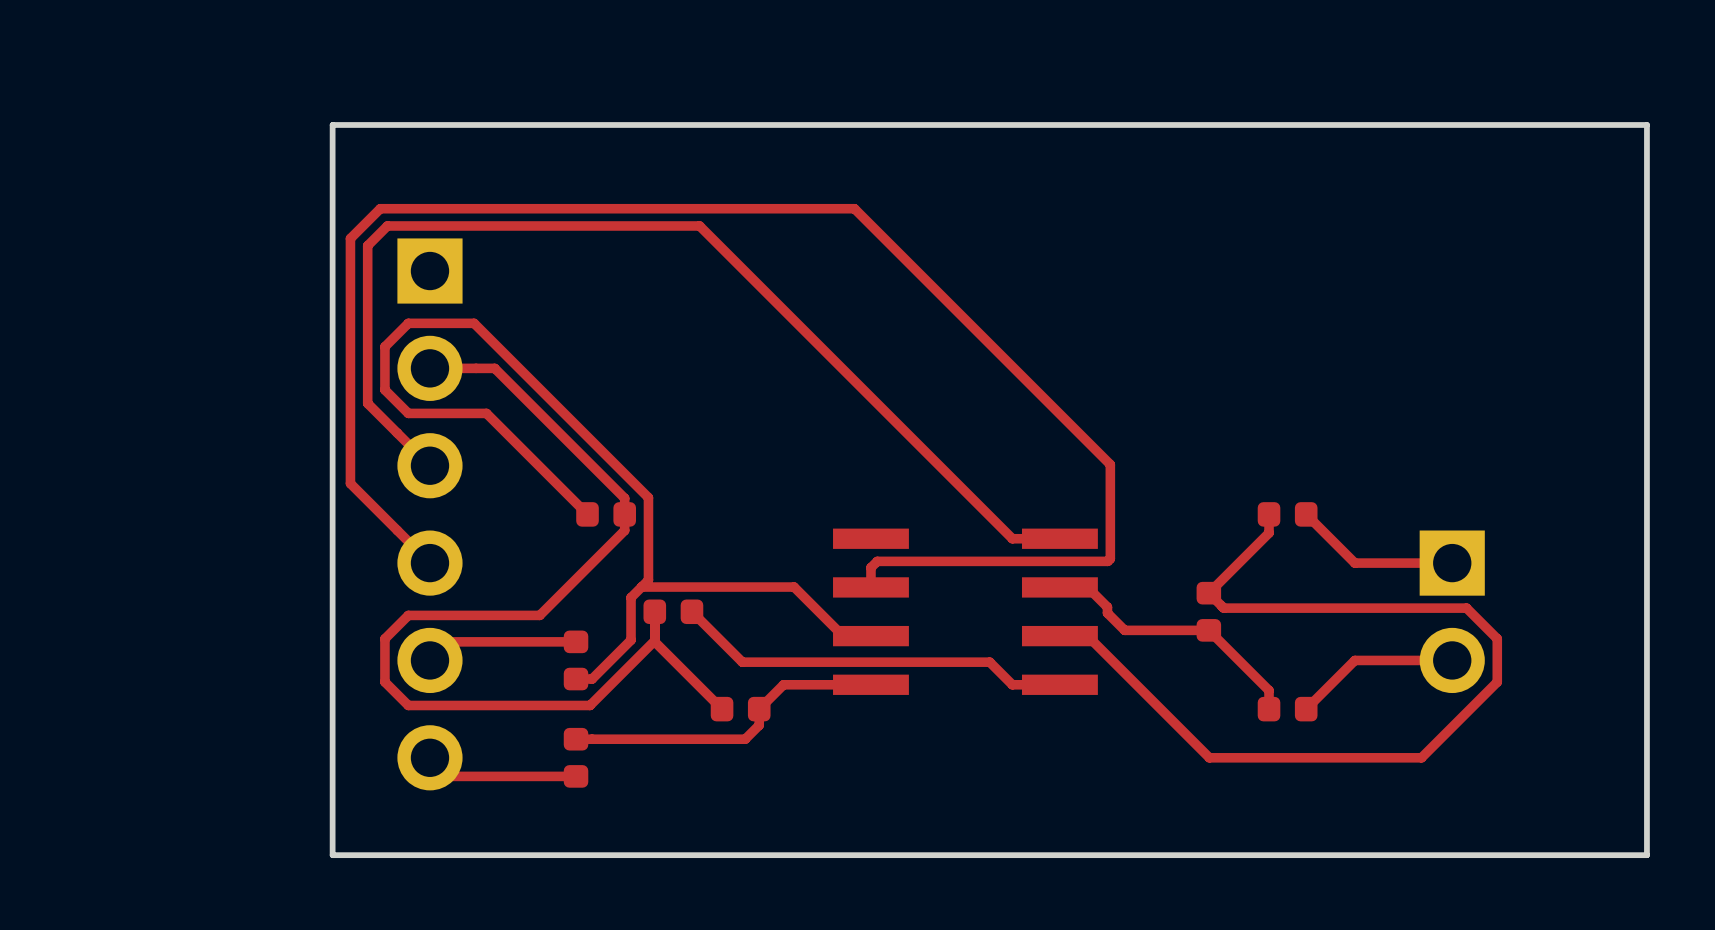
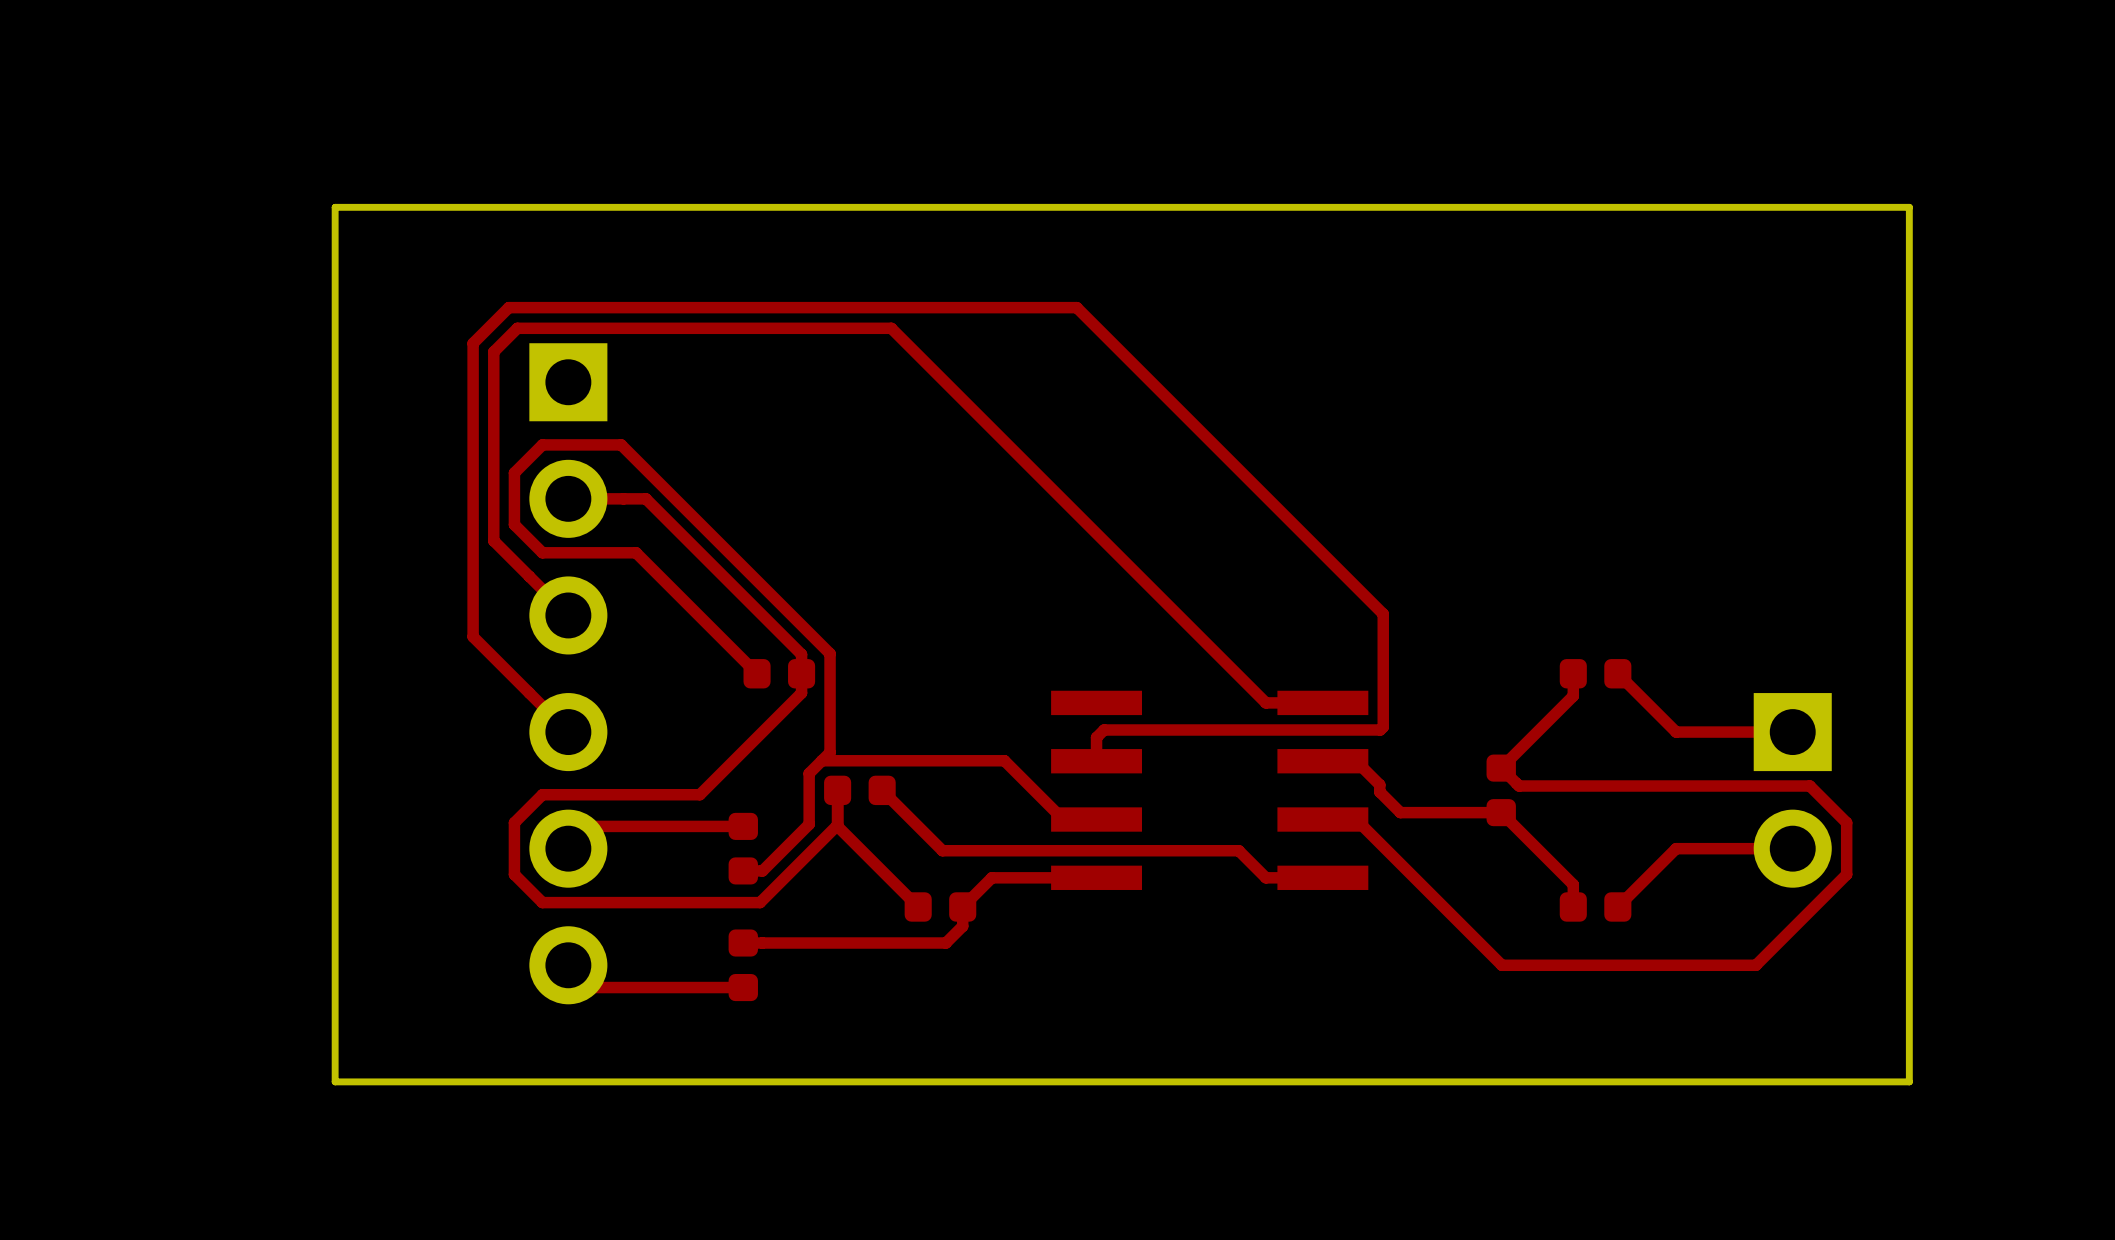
board edge: (332, 124) (332, 855) -> (451, 207) (335, 207) (335, 1081) (451, 1081)
board edge: (1549, 124) (1646, 124) (1646, 855) (1549, 855) -> (1909, 207) (1909, 1081)

